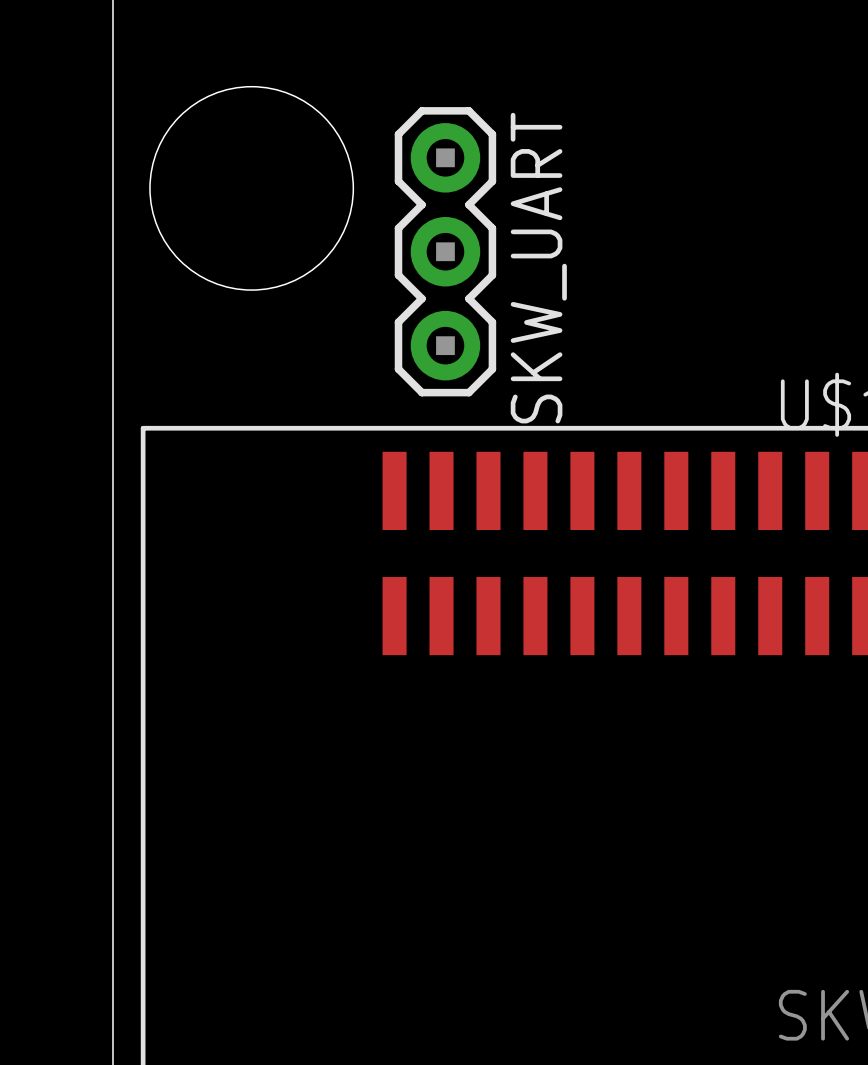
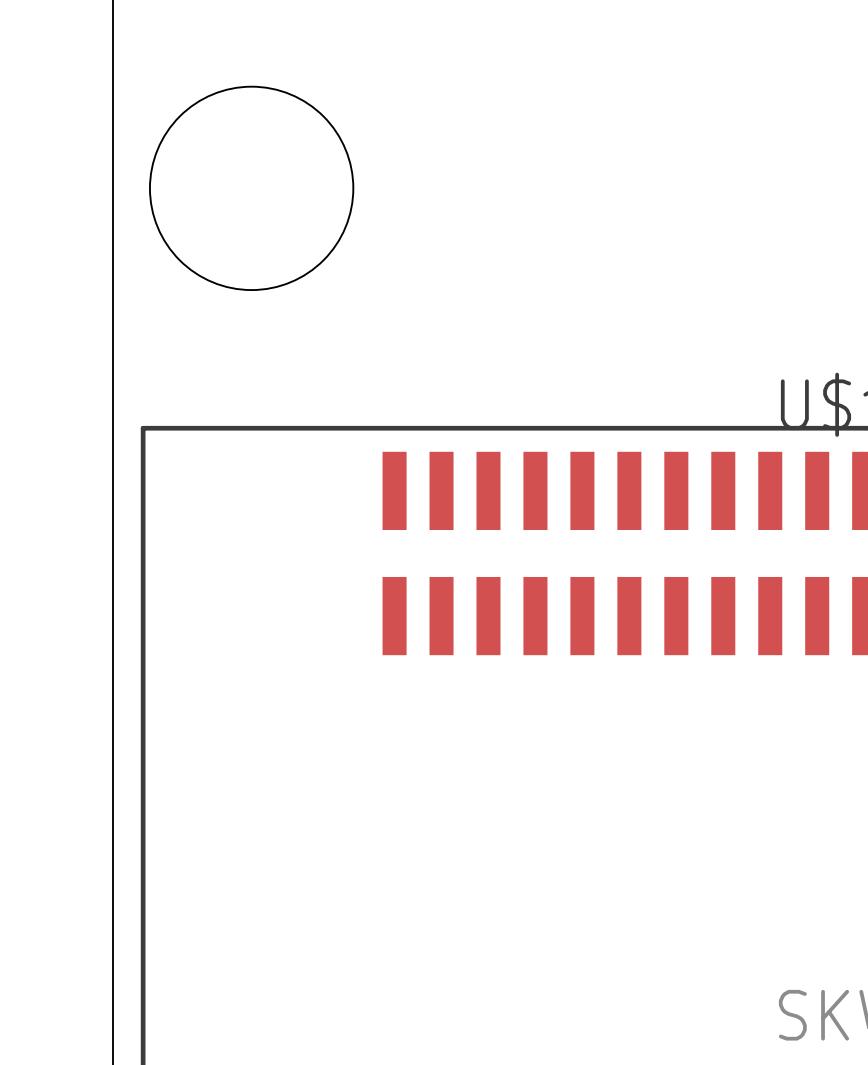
SKW_UART: (445, 251) -> none

